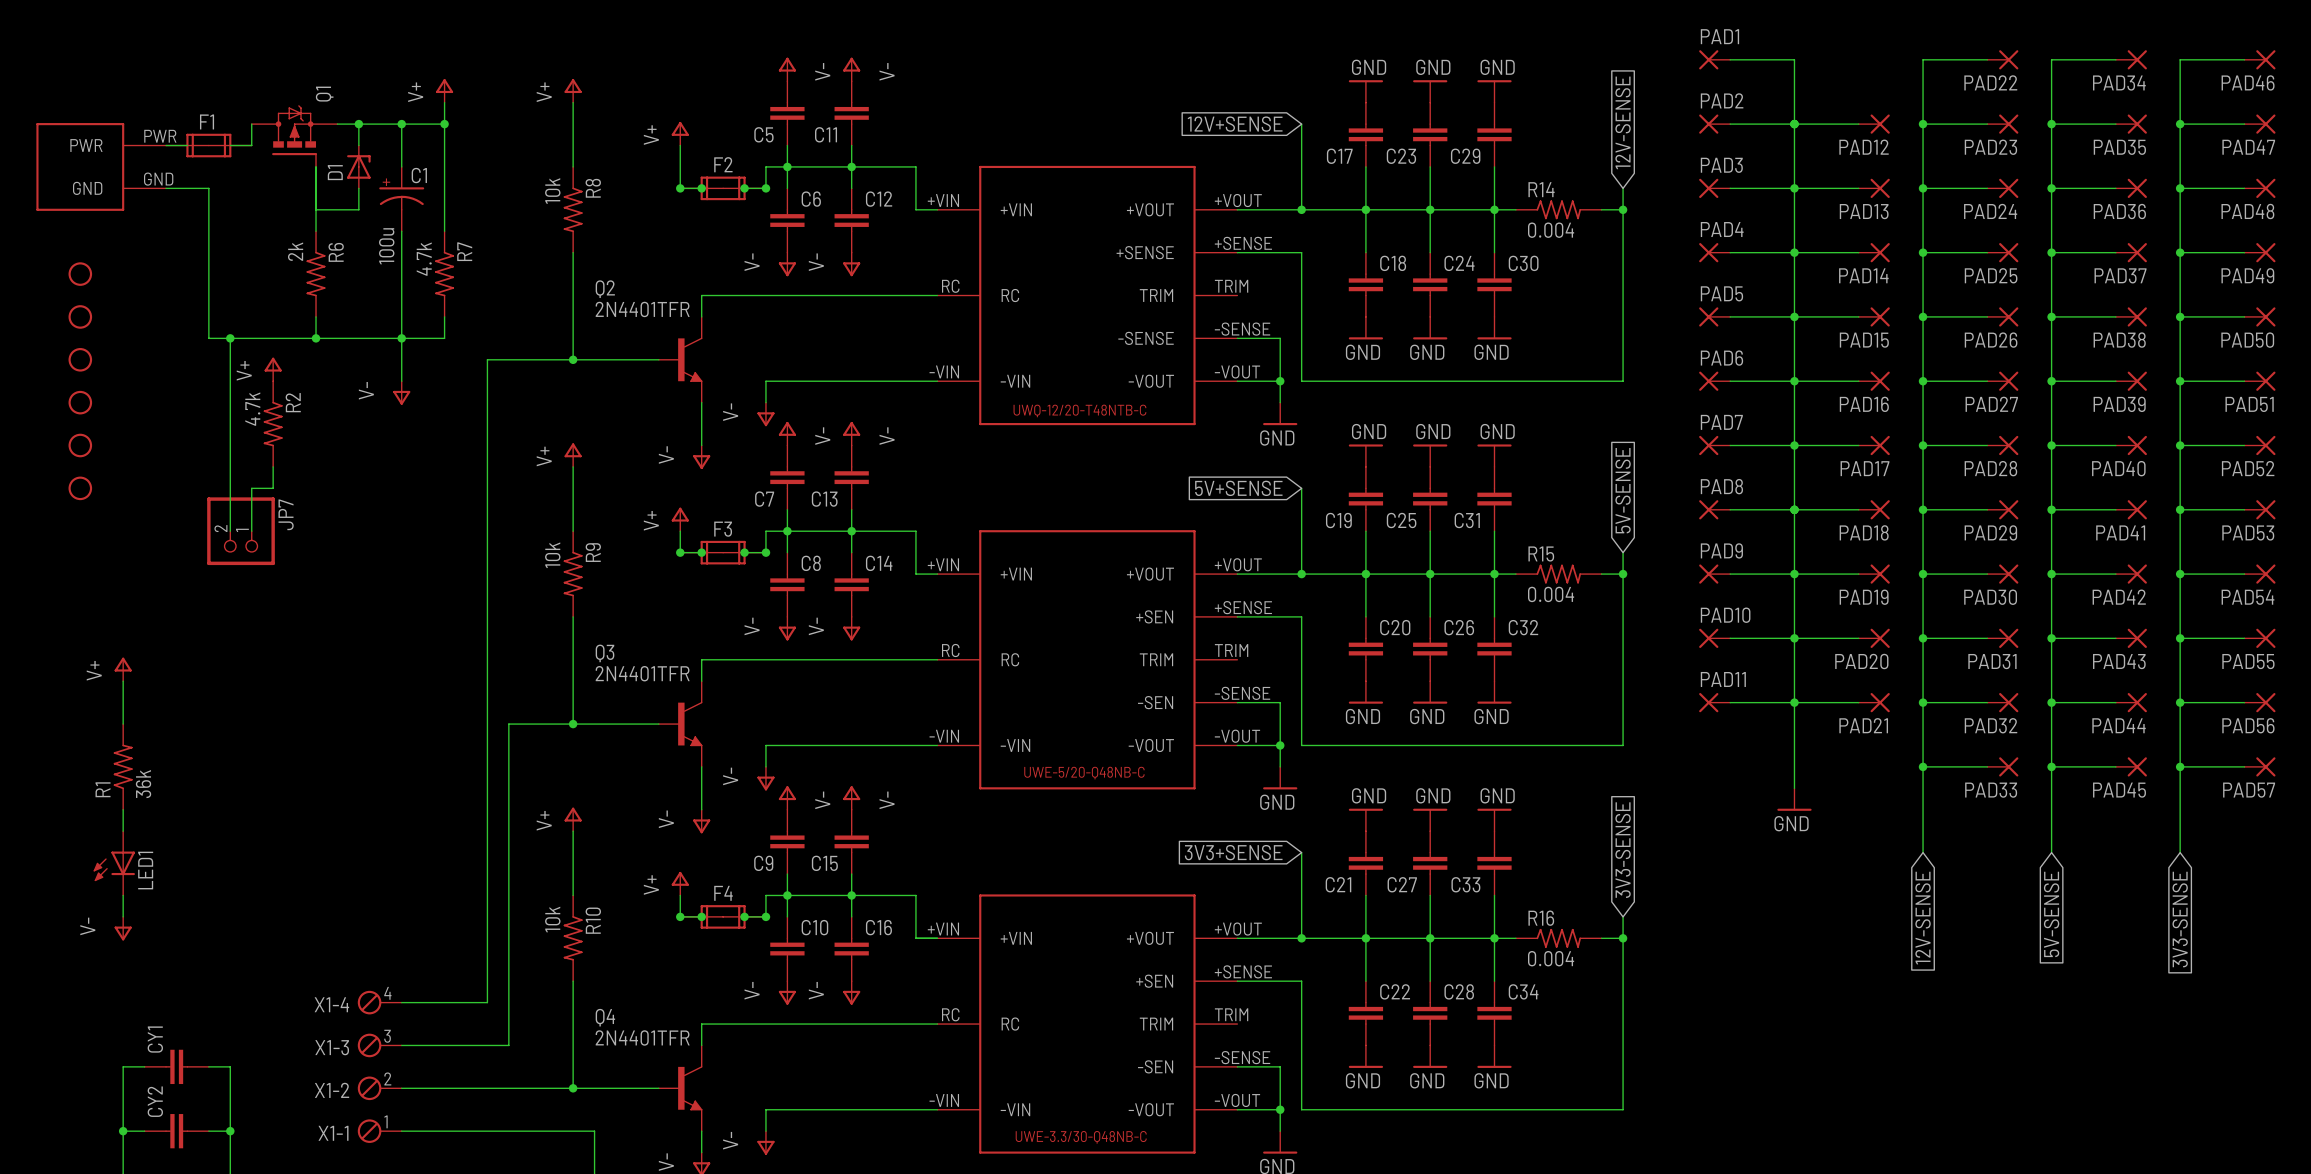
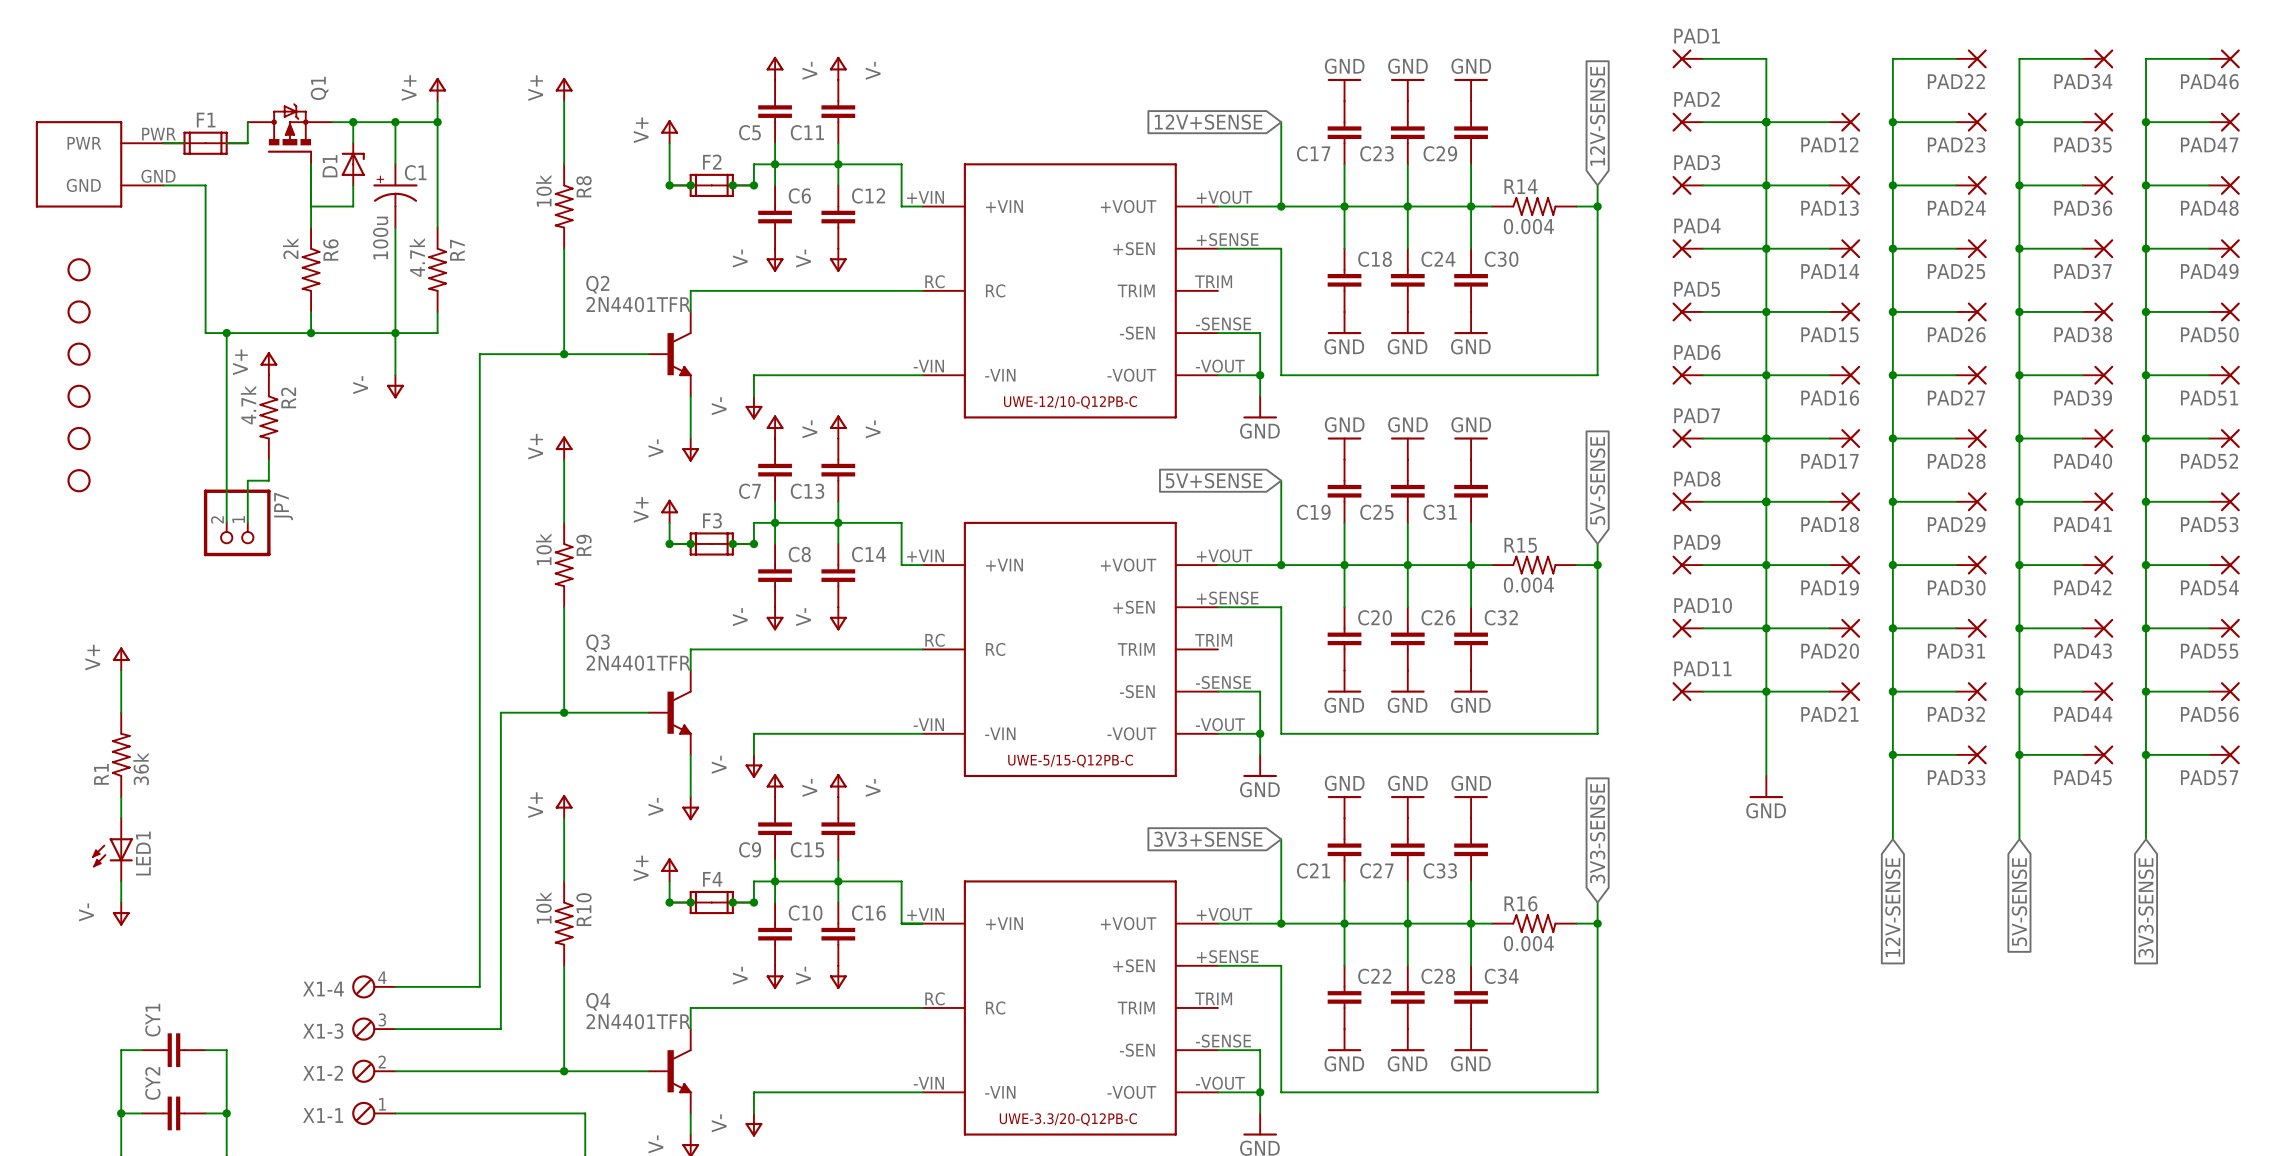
part pin name: +SENSE (1145, 252) -> +SEN (1134, 248)
part pin name: -SENSE (1146, 338) -> -SEN (1137, 333)
part text: none -> UWE-12/10-Q12PB-C (1070, 402)
part text: UWQ-12/20-T48NTB-C (1079, 410) -> none
part text: UWE-5/20-Q48NB-C (1084, 773) -> UWE-5/15-Q12PB-C (1070, 761)
part text: UWE-3.3/30-Q48NB-C (1081, 1137) -> UWE-3.3/20-Q12PB-C (1068, 1119)

